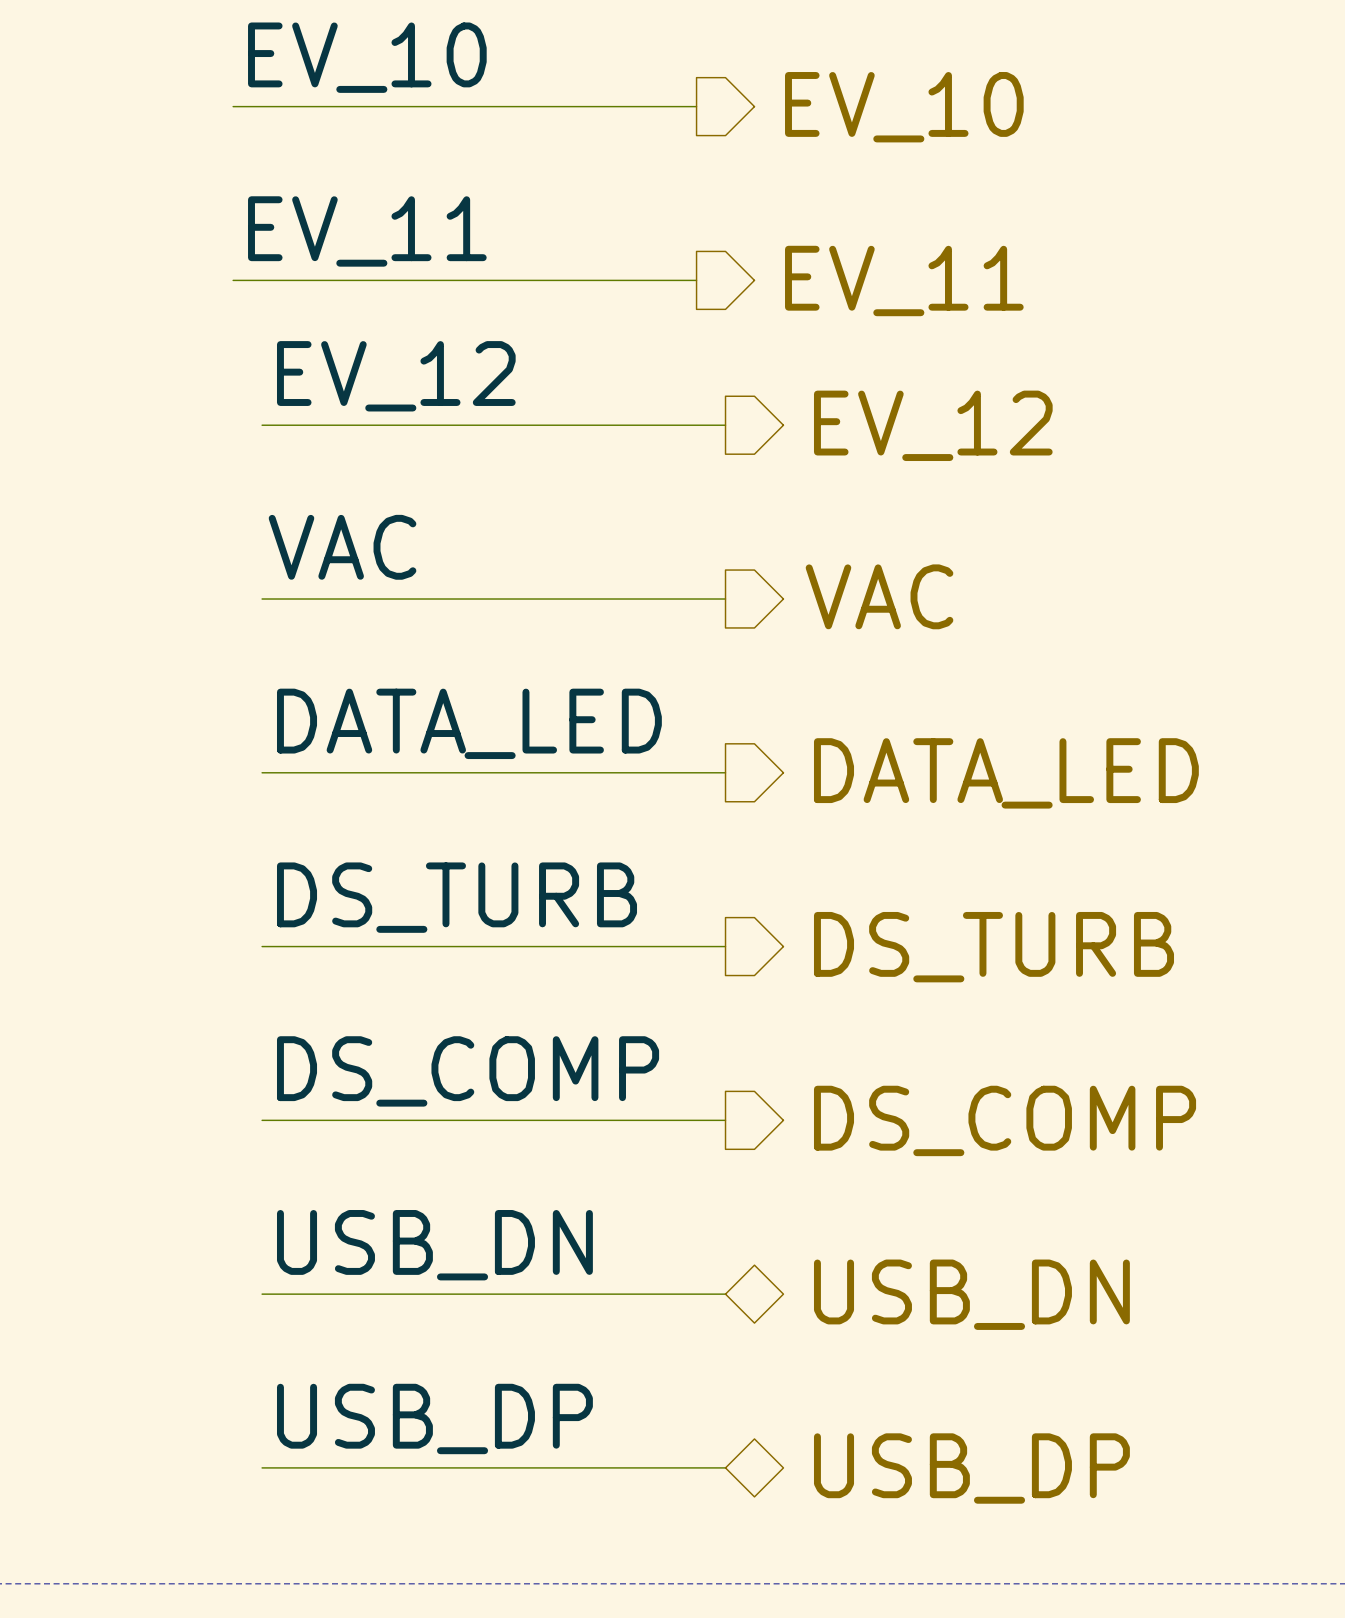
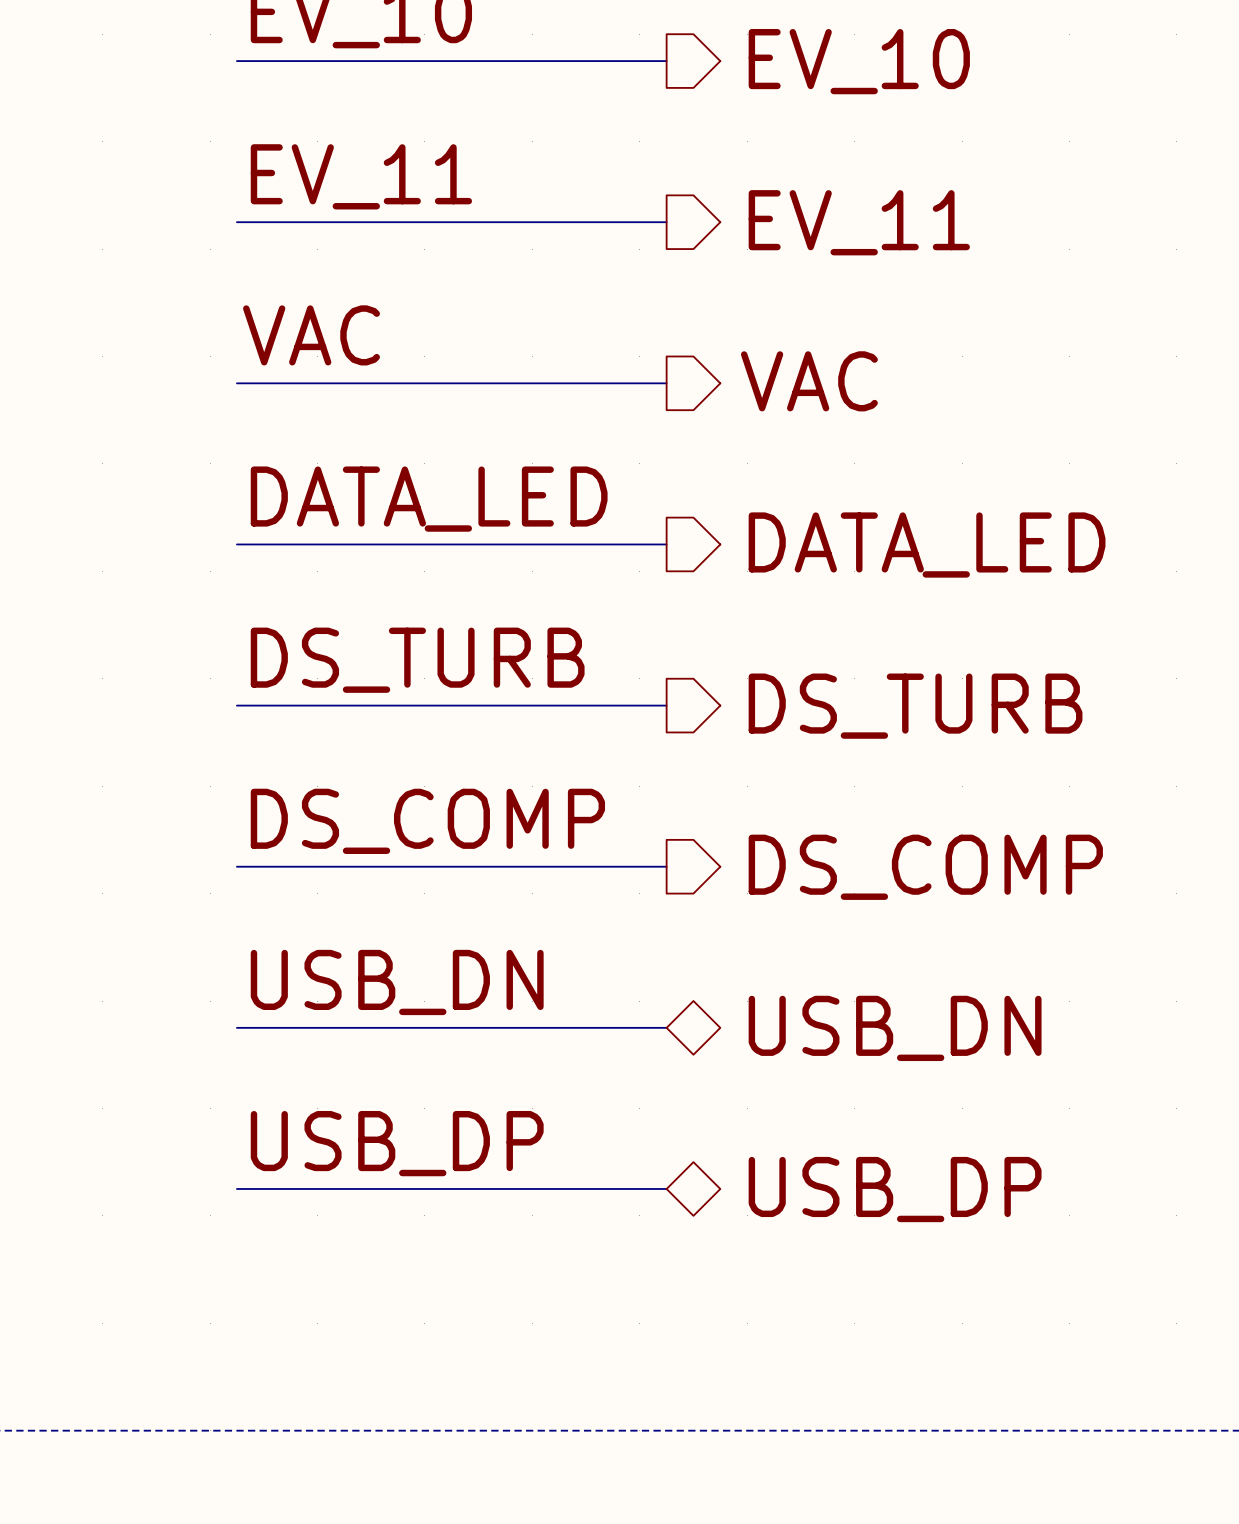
label: EV_12 (396, 376) -> none
wire: (262, 425) (725, 425) -> (236, 383) (666, 383)
hierarchical label: EV_12 (933, 425) -> none
label position: VAC (342, 547) -> VAC (311, 335)
hierarchical label position: VAC (879, 596) -> VAC (809, 381)
wire: (262, 599) (725, 599) -> (236, 544) (666, 544)
label position: DATA_LED (469, 723) -> DATA_LED (429, 499)
wire: (262, 772) (725, 772) -> (236, 705) (666, 705)
hierarchical label position: DATA_LED (1006, 773) -> DATA_LED (927, 545)
label position: DS_TURB (457, 897) -> DS_TURB (417, 660)
wire: (262, 946) (725, 946) -> (236, 866) (666, 866)
hierarchical label position: DS_TURB (993, 947) -> DS_TURB (915, 706)
label position: DS_COMP (468, 1071) -> DS_COMP (427, 821)
wire: (262, 1120) (725, 1120) -> (236, 1027) (666, 1027)
hierarchical label position: DS_COMP (1005, 1120) -> DS_COMP (925, 867)
label position: USB_DN (434, 1245) -> USB_DN (397, 982)
wire: (262, 1294) (725, 1294) -> (236, 1188) (666, 1188)
hierarchical label position: USB_DN (971, 1294) -> USB_DN (895, 1028)
label position: USB_DP (434, 1418) -> USB_DP (397, 1143)
wire: (262, 1467) (725, 1467) -> none
hierarchical label position: USB_DP (971, 1468) -> USB_DP (895, 1189)

